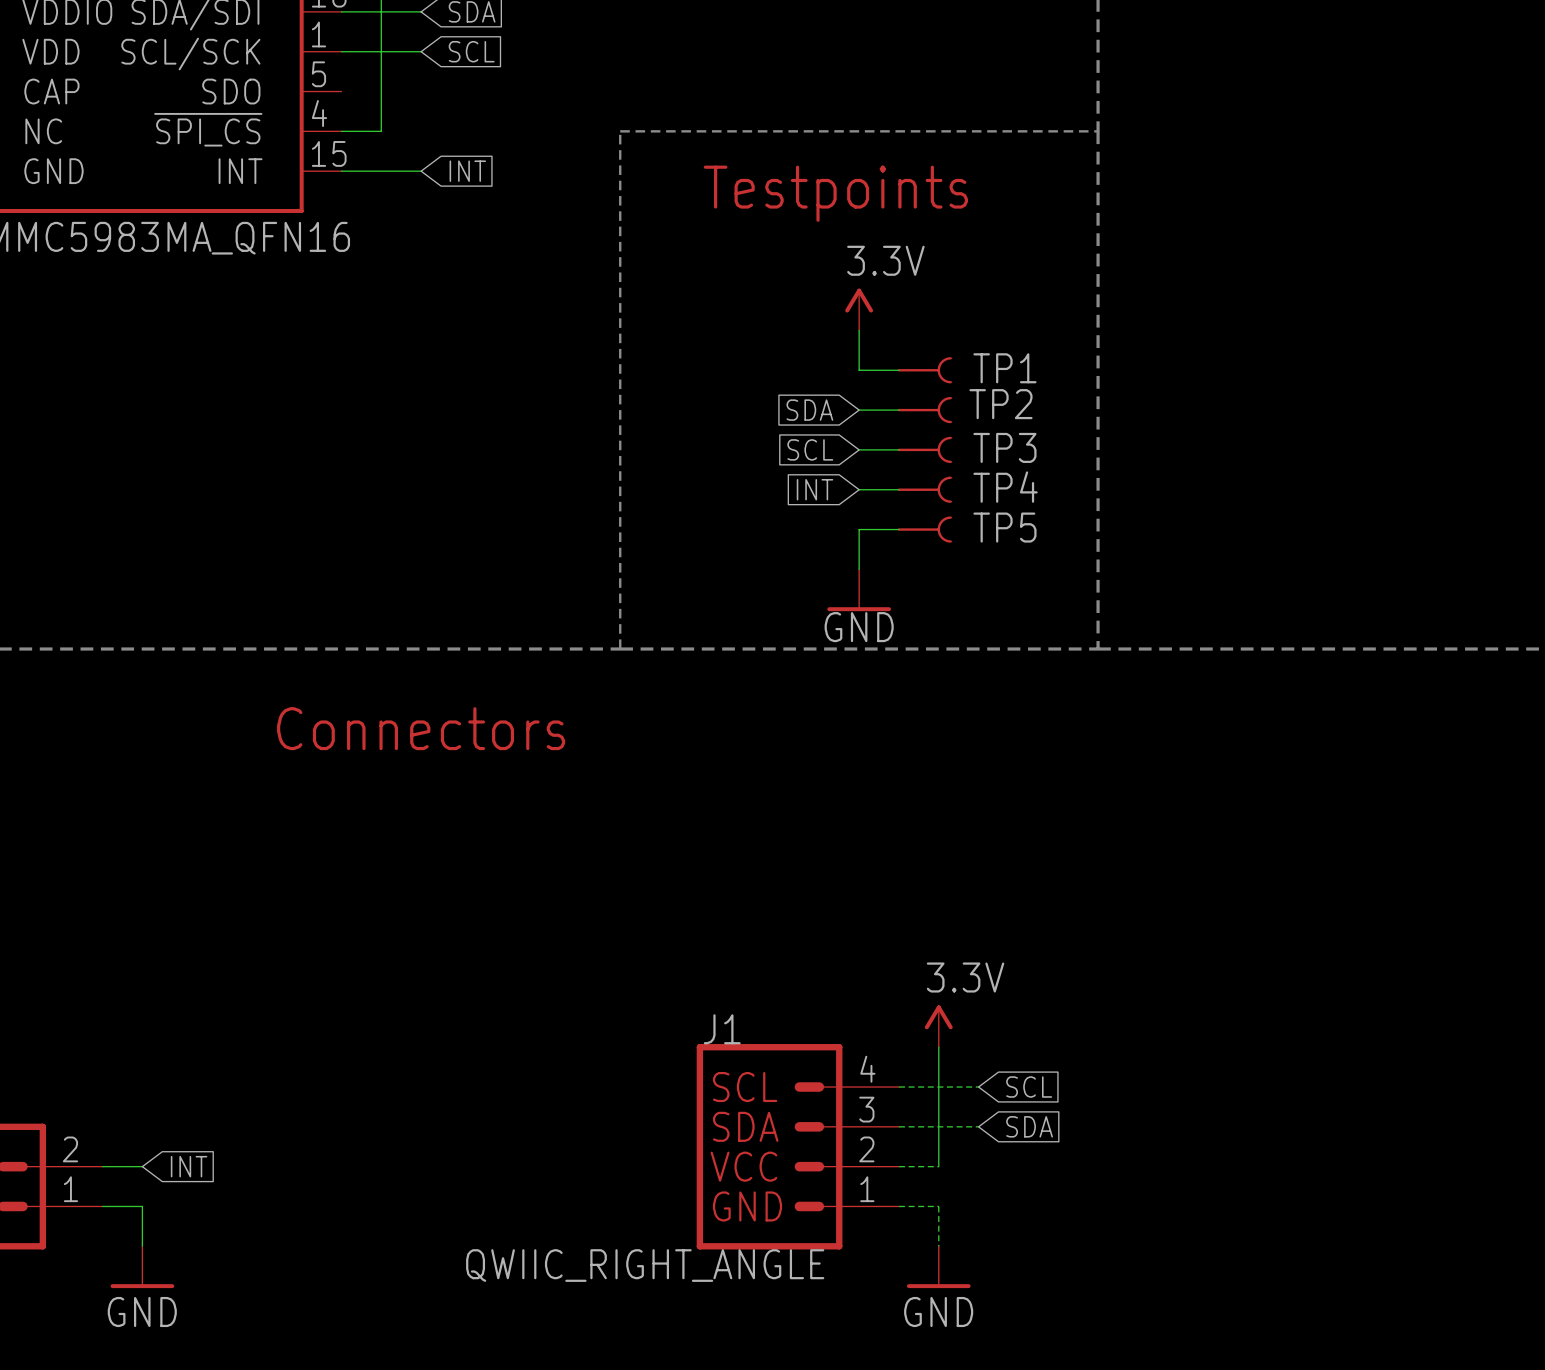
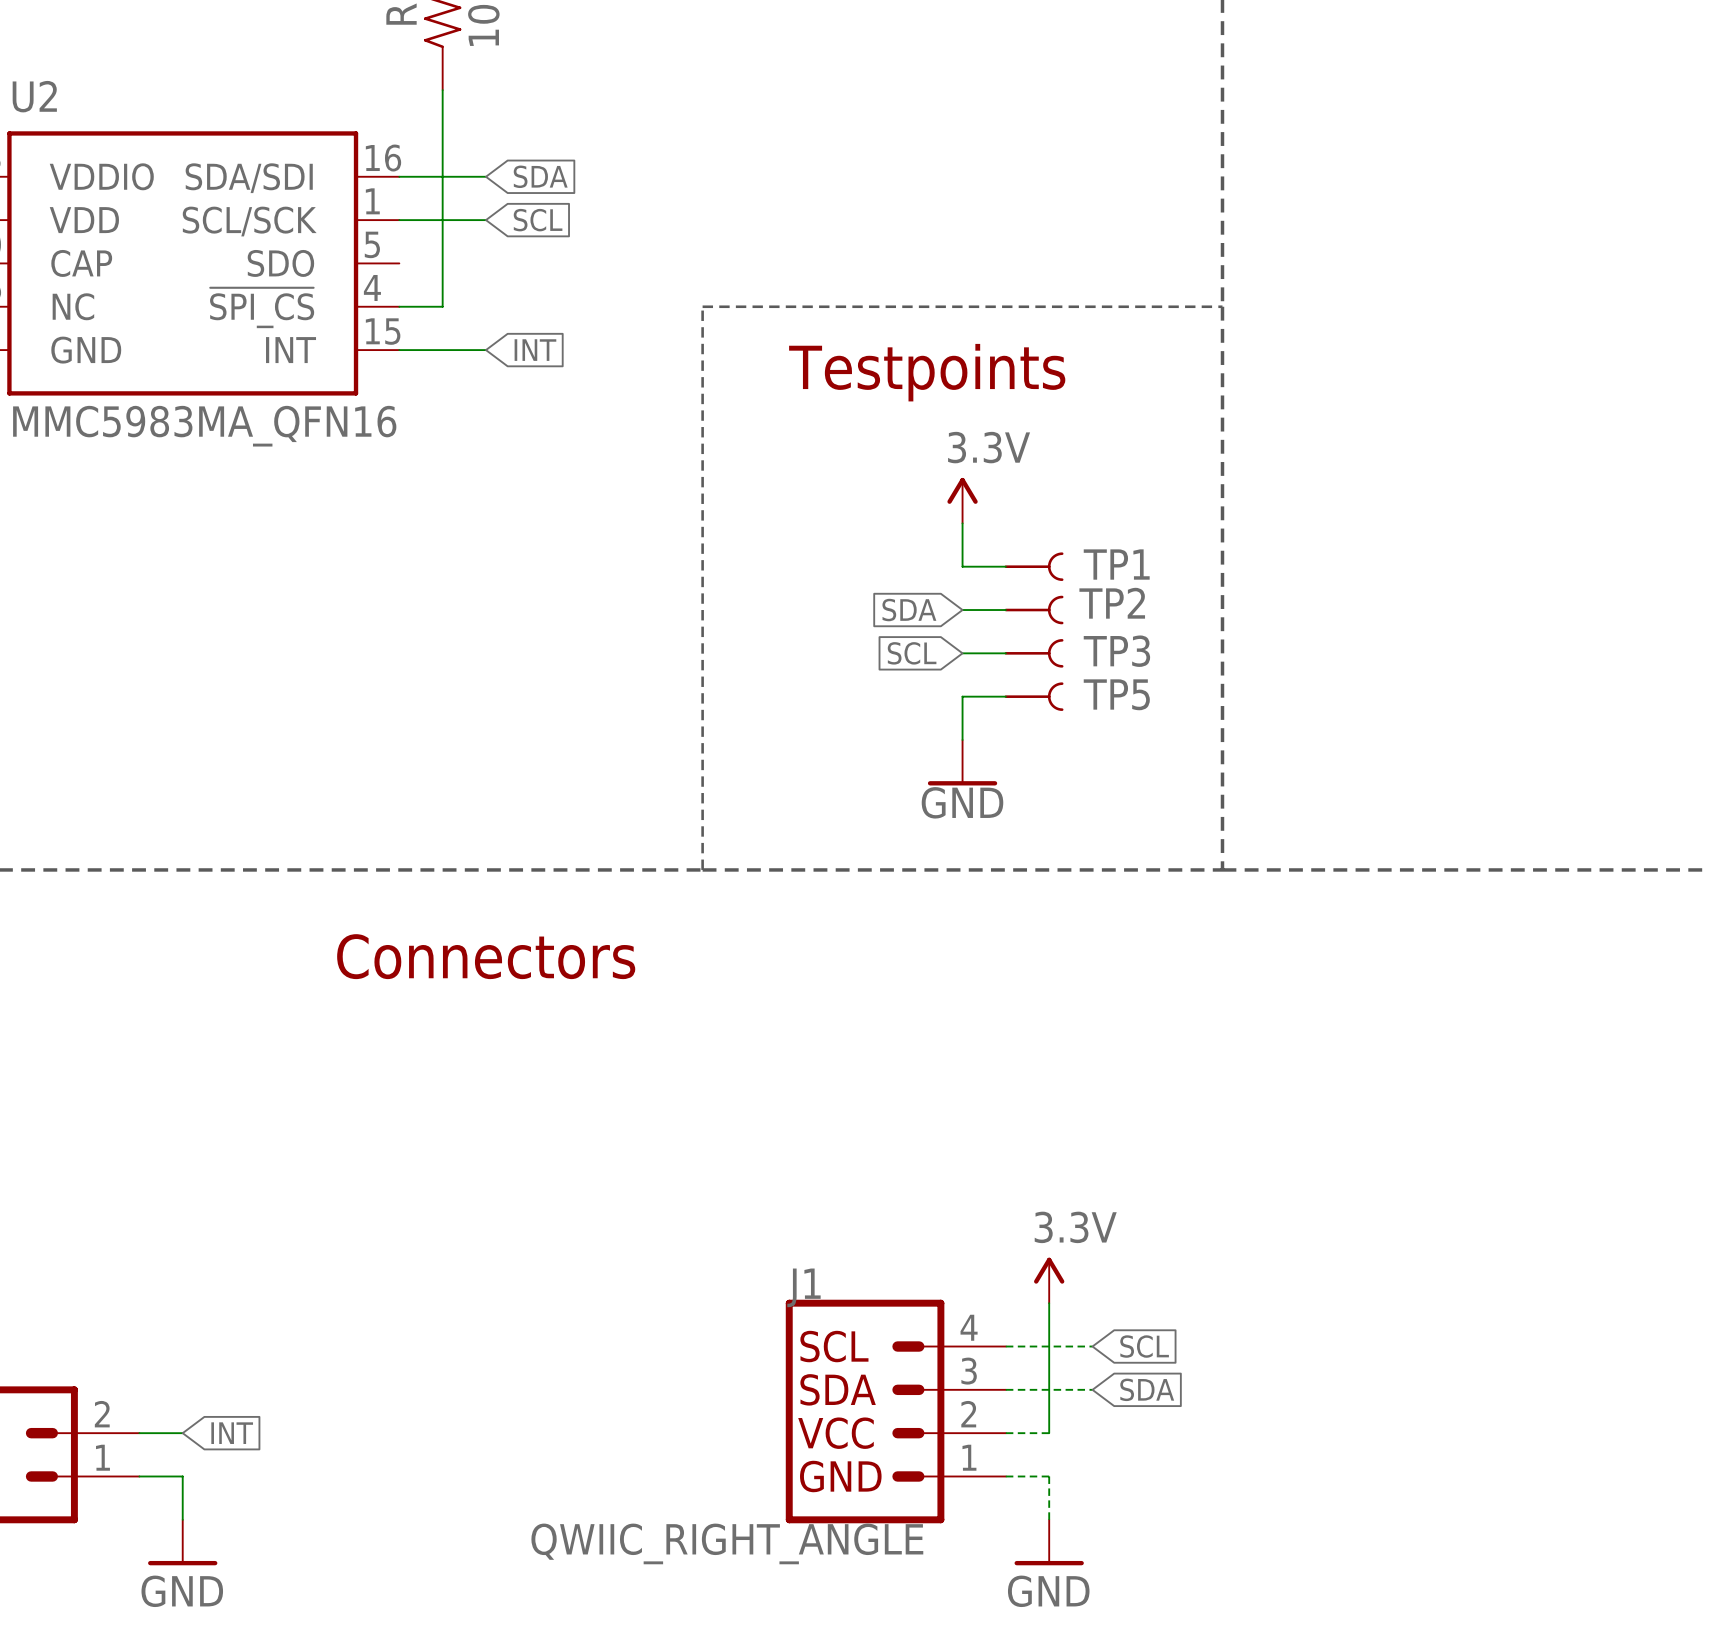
TP4 name: TP4 (1005, 487) -> TP5 (1116, 694)
global label: INT (815, 489) -> none
wire: none -> (962, 696) (962, 739)
wire: (898, 529) (859, 529) (859, 569) -> none
TP5: (924, 529) -> none
power symbol position: GND (859, 590) -> GND (962, 762)

